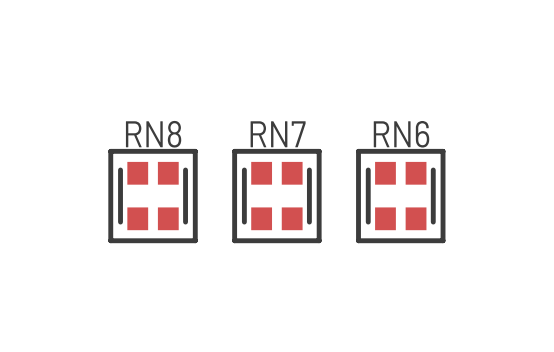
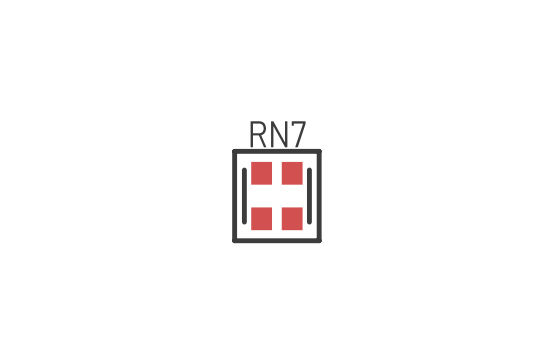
RN8: (153, 196) -> none
RN6: (400, 196) -> none

